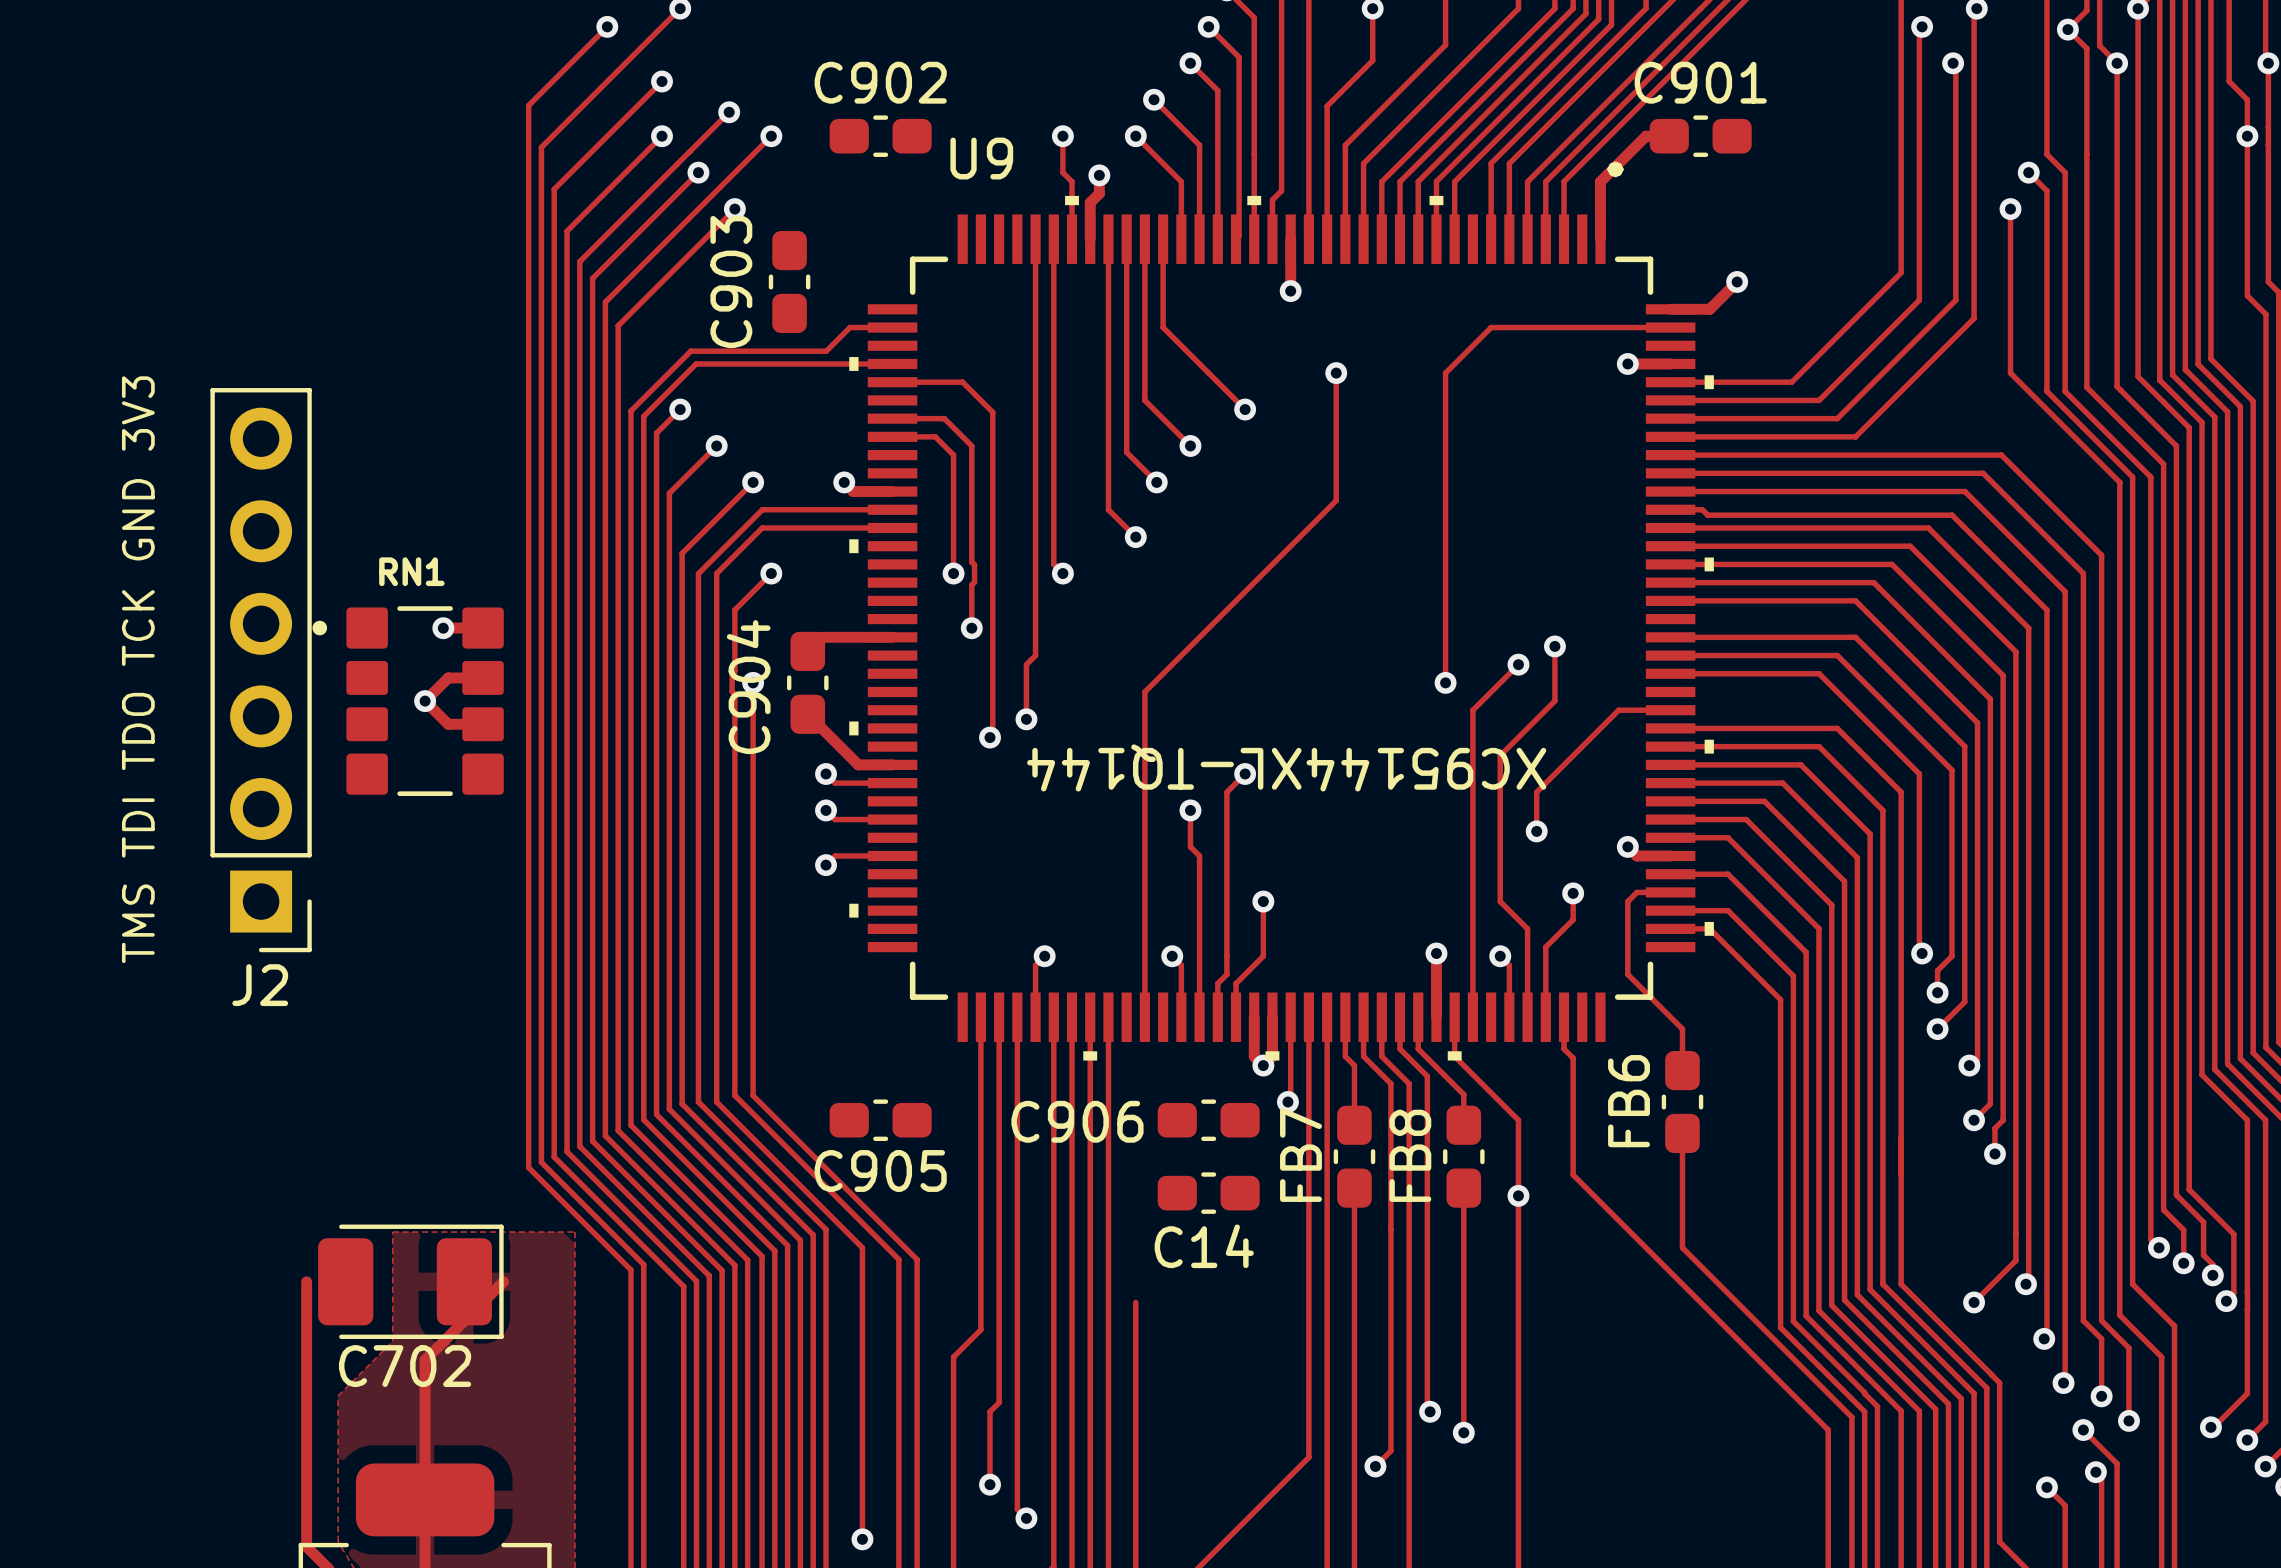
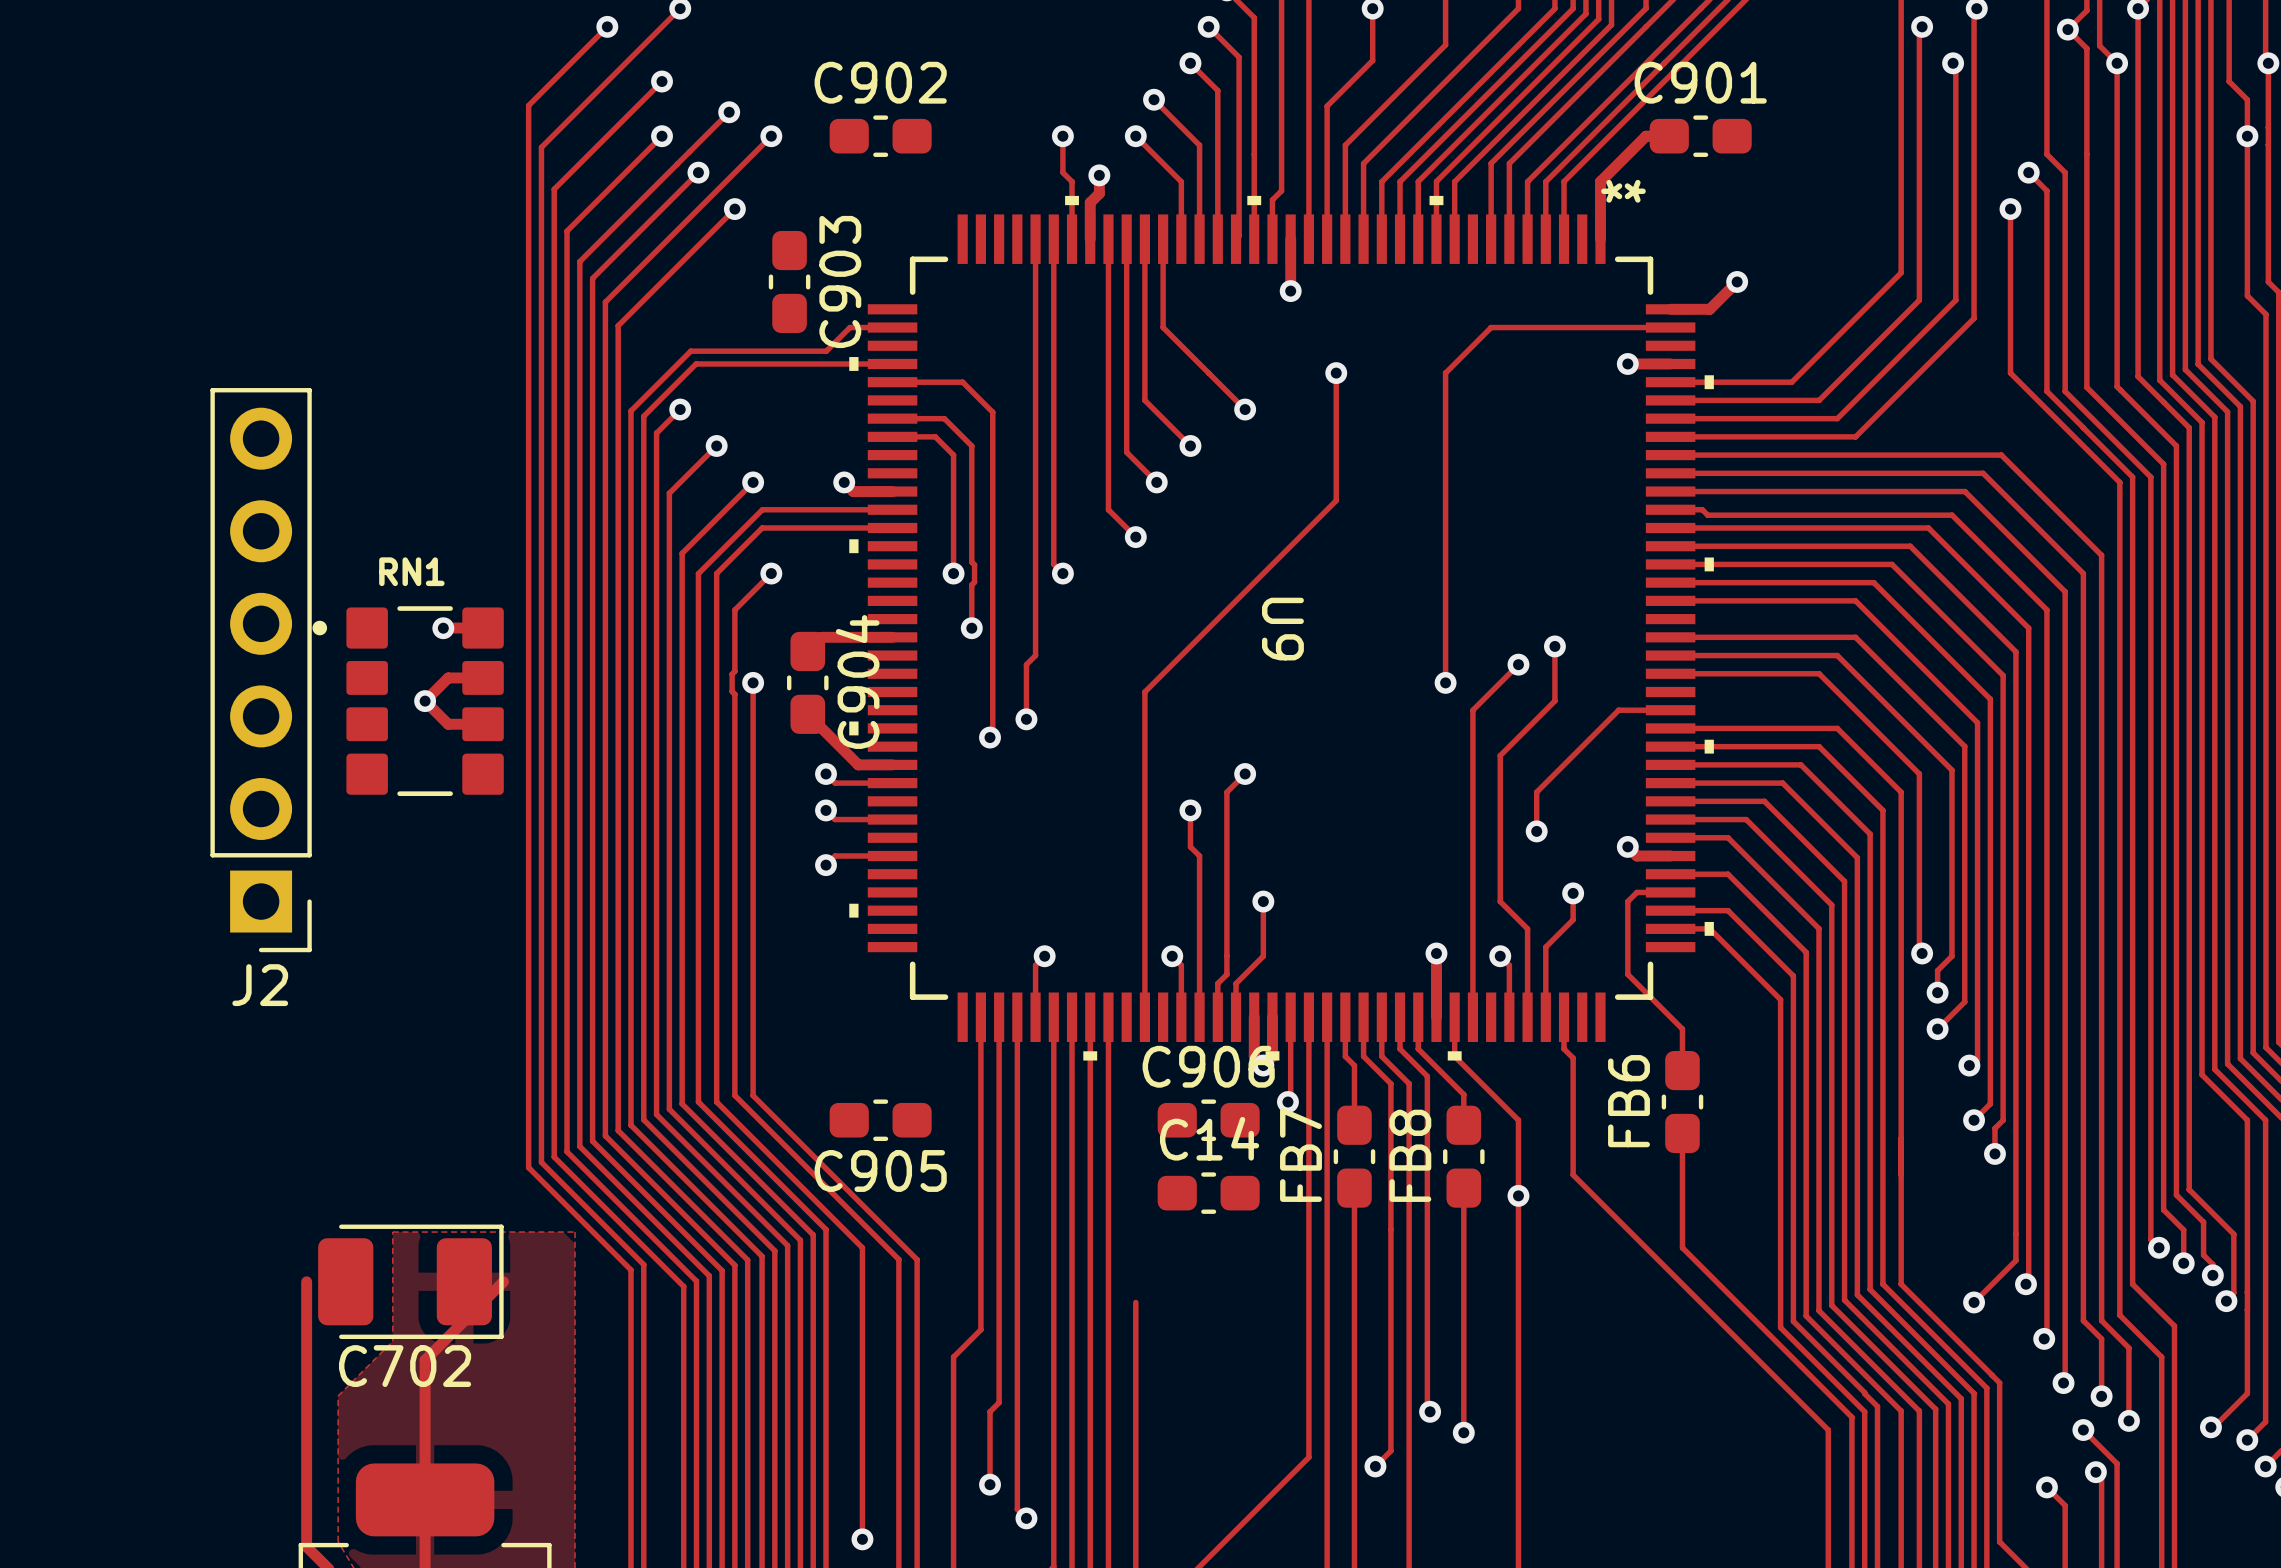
U9 name position: U9 (981, 158) -> U9 (1282, 629)
U9 footprint: [849, 195, 1714, 1061] -> [849, 195, 1714, 1061]
C903 name position: C903 (731, 281) -> C903 (840, 281)
text: TMS TDI TDO TCK GND 3V3 (138, 669) -> none
C904 name position: C904 (748, 687) -> C904 (857, 682)
text: XC95144XL-TQ144 (1286, 767) -> none
C906 name position: C906 (1077, 1121) -> C906 (1208, 1066)
C14 name position: C14 (1204, 1246) -> C14 (1209, 1138)

